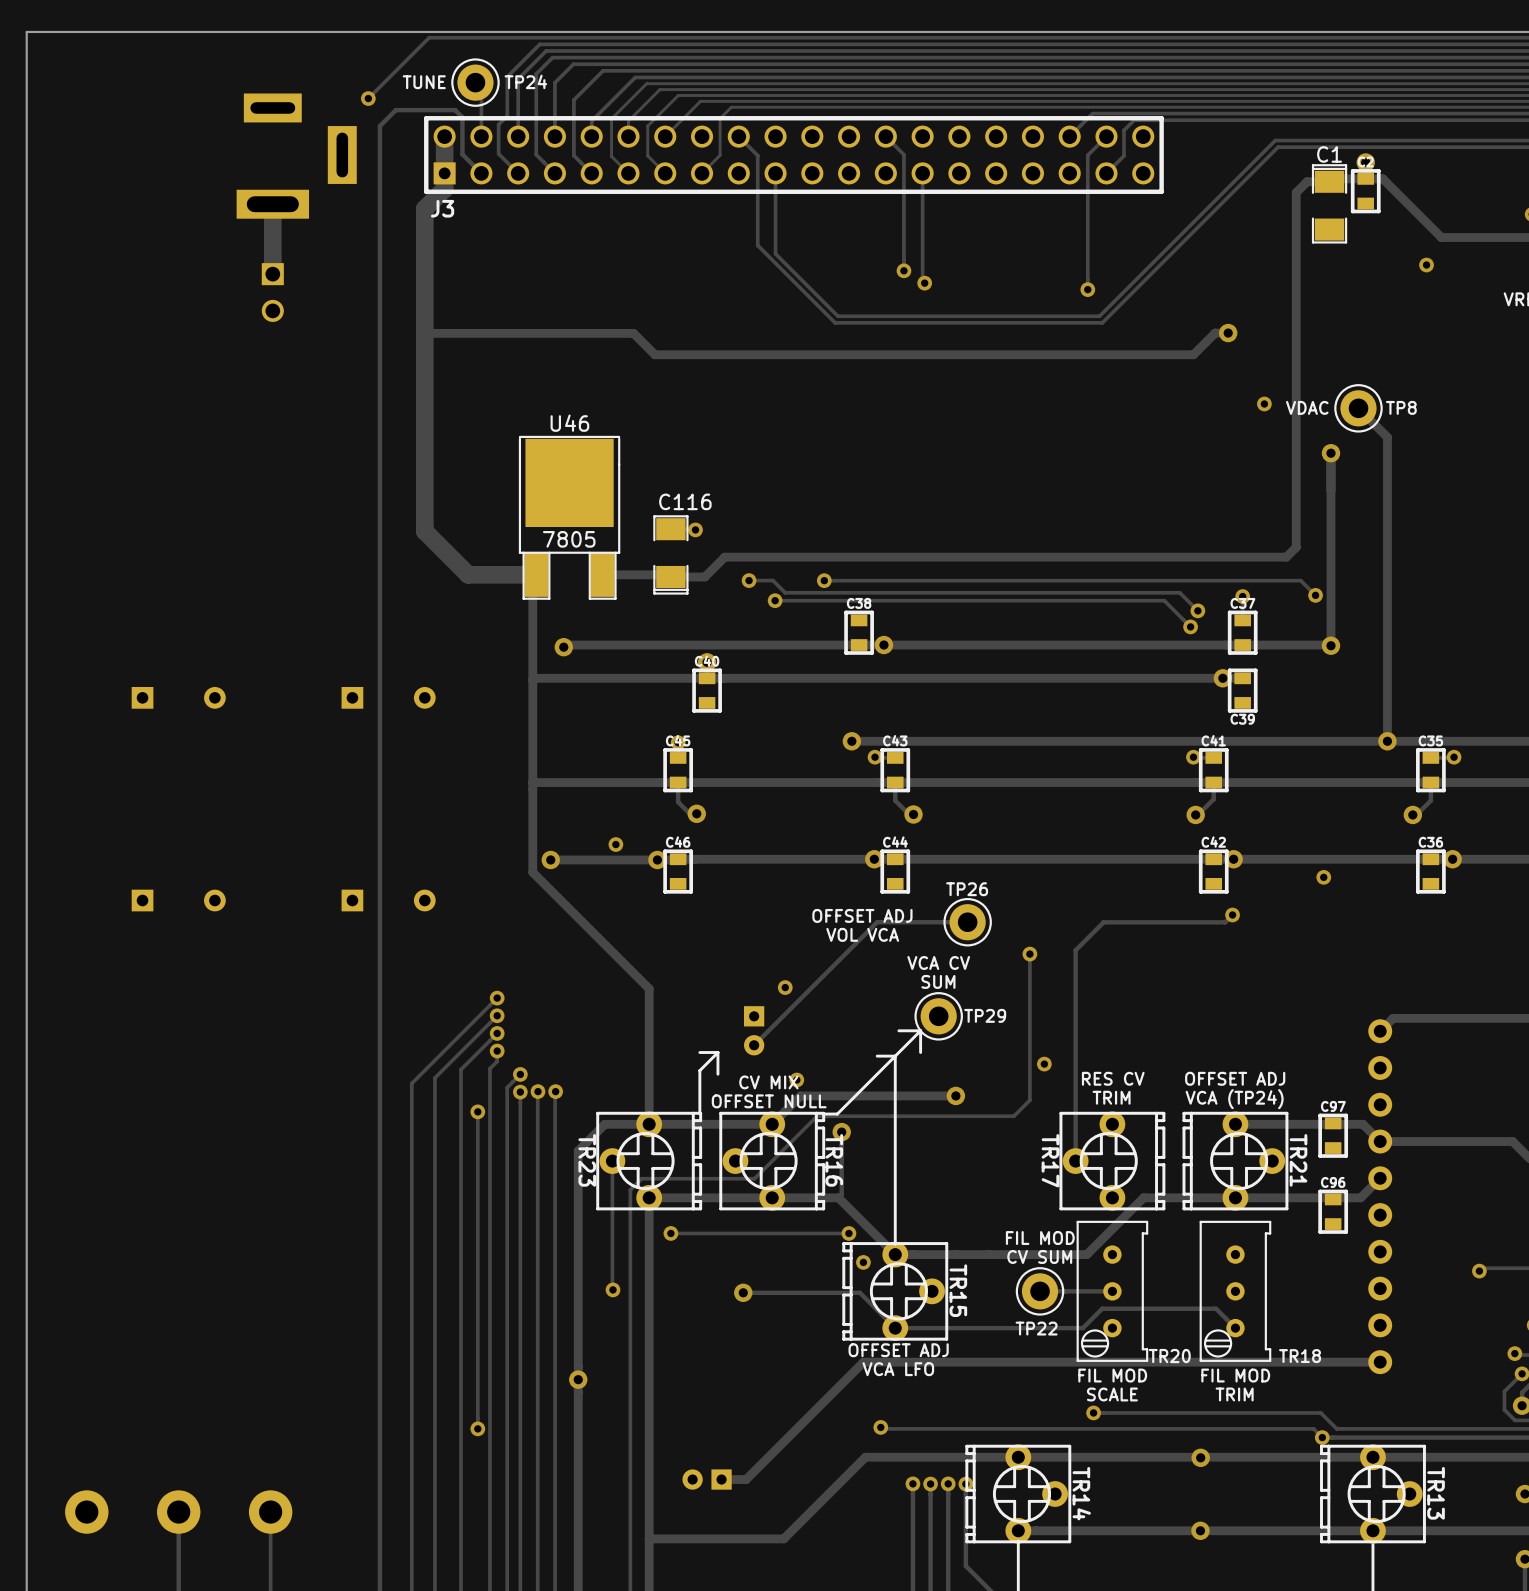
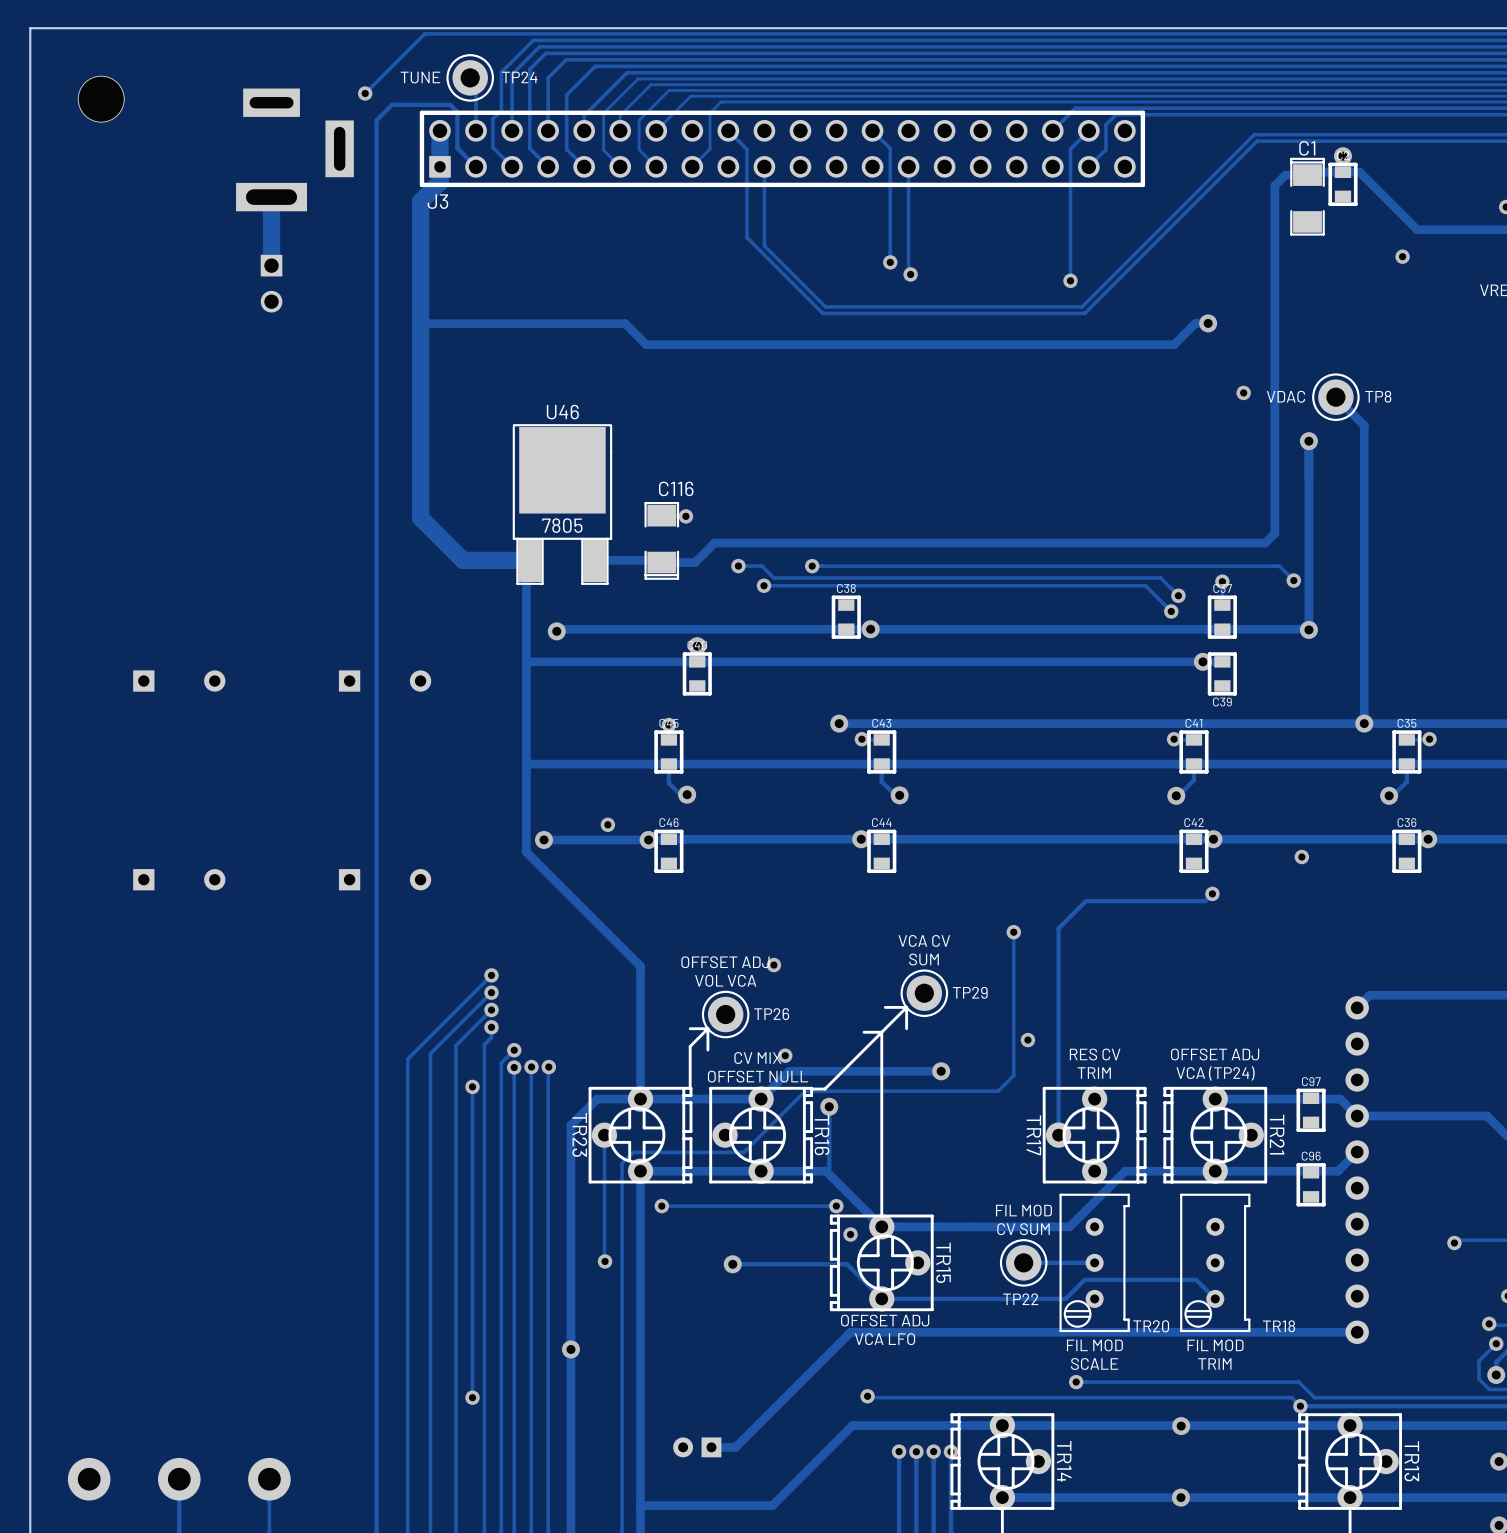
part: none -> (101, 99)
TP26 name position: TP26 (967, 889) -> TP26 (771, 1014)
text position: OFFSET ADJ (862, 915) -> OFFSET ADJ (725, 962)
track: (967, 922) (877, 922) (754, 1045) -> none
TP26 position: (967, 922) -> (725, 1014)
text position: VOL VCA (862, 934) -> VOL VCA (725, 980)
part: (754, 1030) -> none

